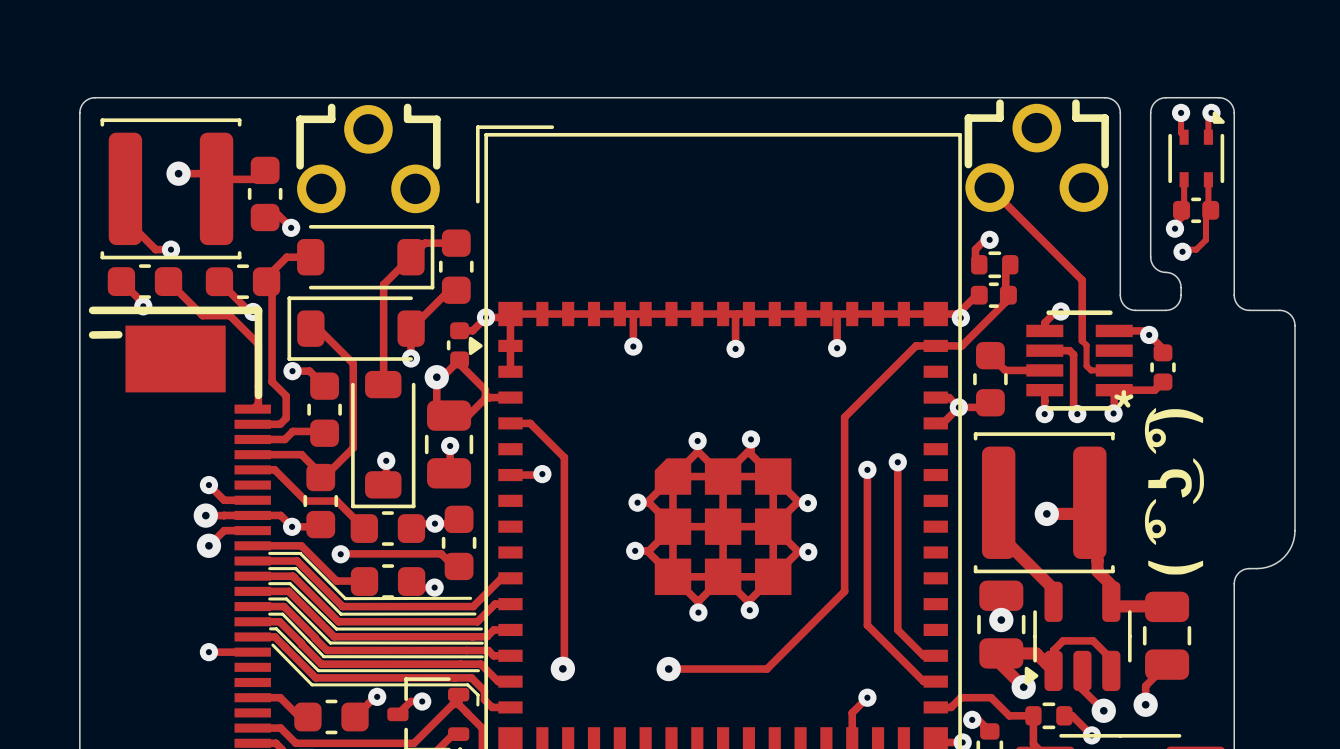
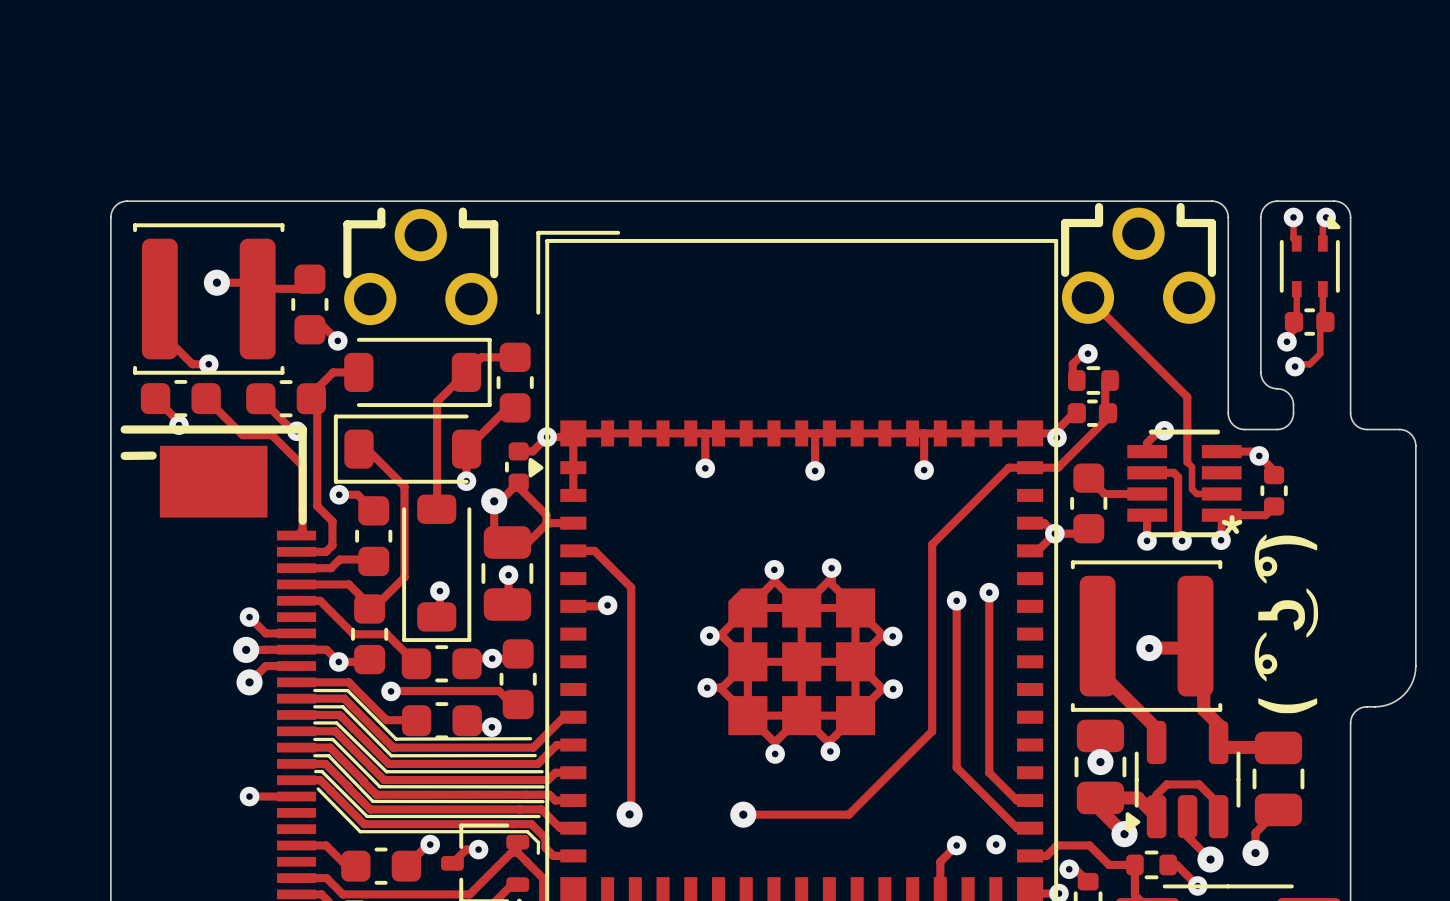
via: none -> (996, 844)

